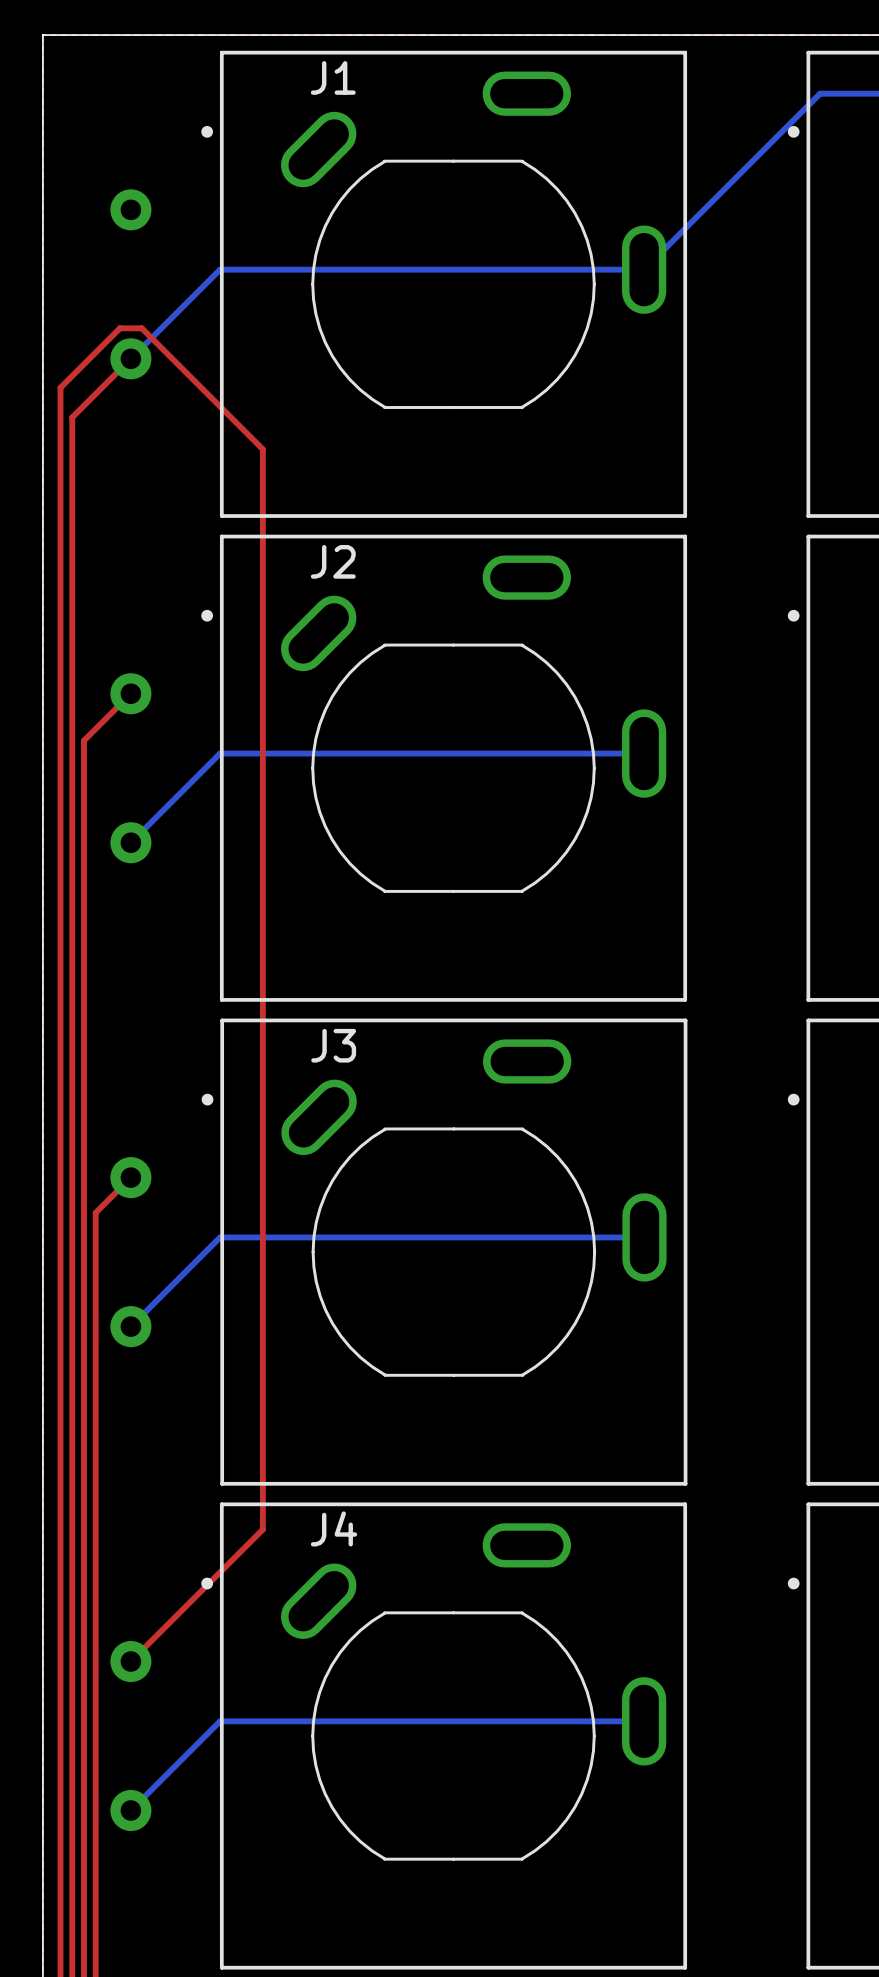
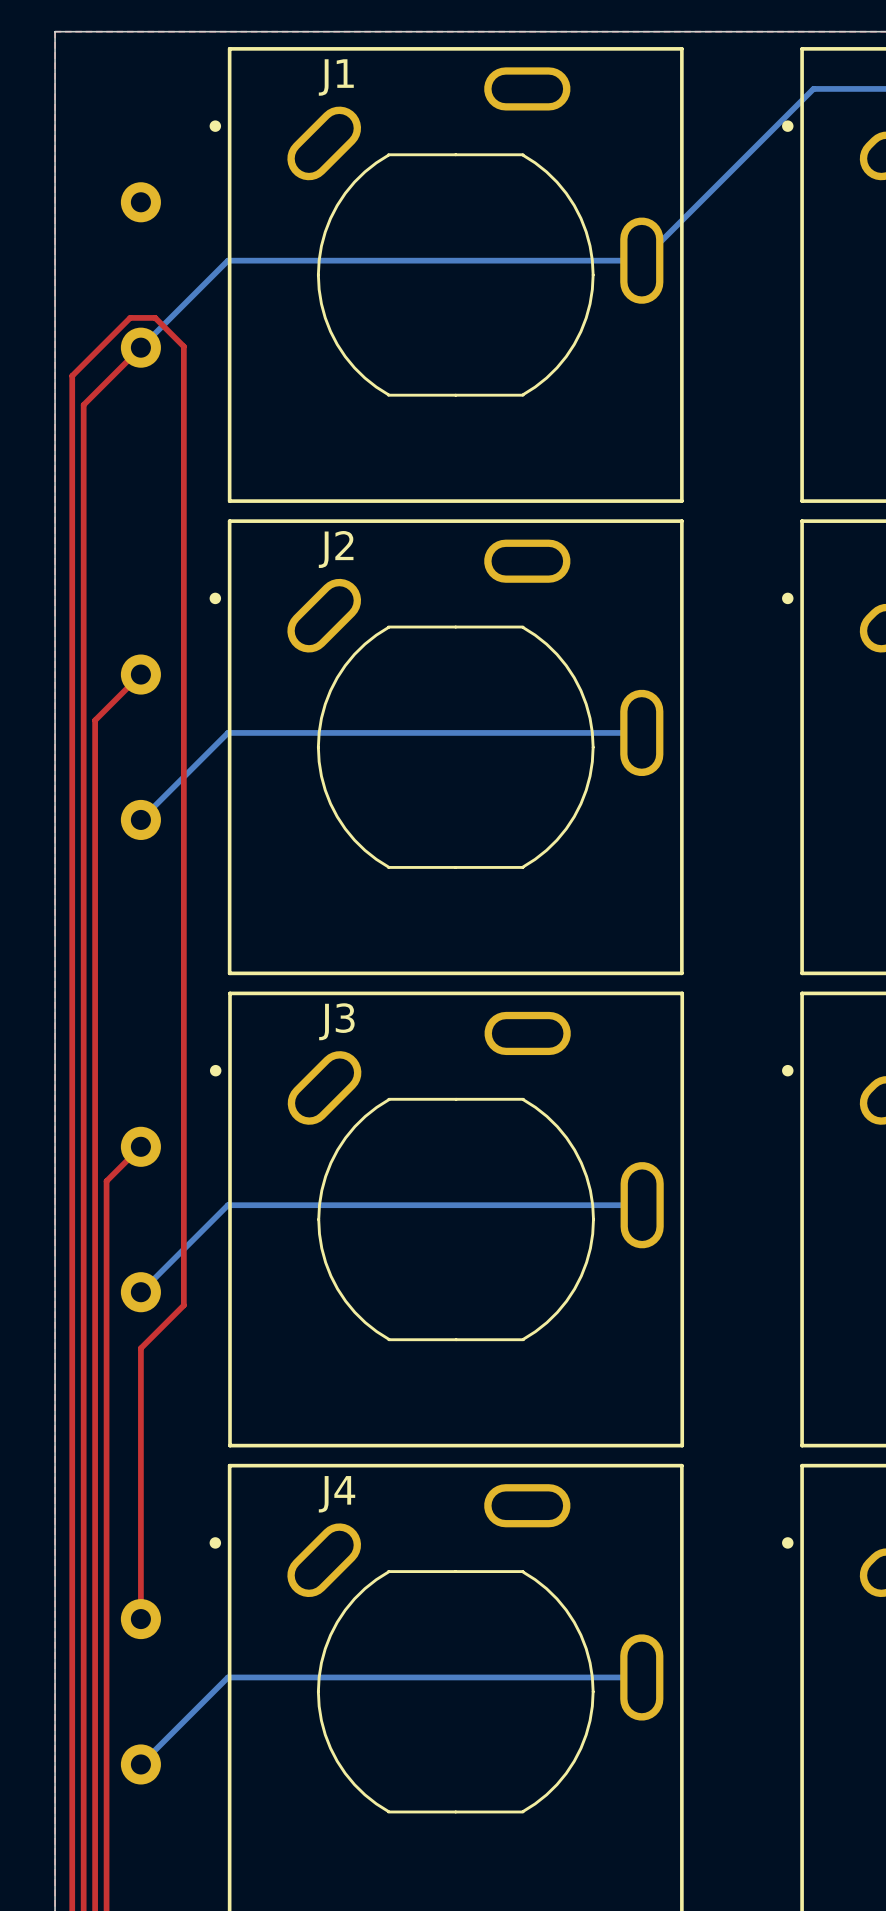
top track: (141, 328) (262, 449) (262, 1529) (130, 1661) -> (151, 317) (155, 317) (183, 346) (183, 1305) (140, 1348) (140, 1619)

